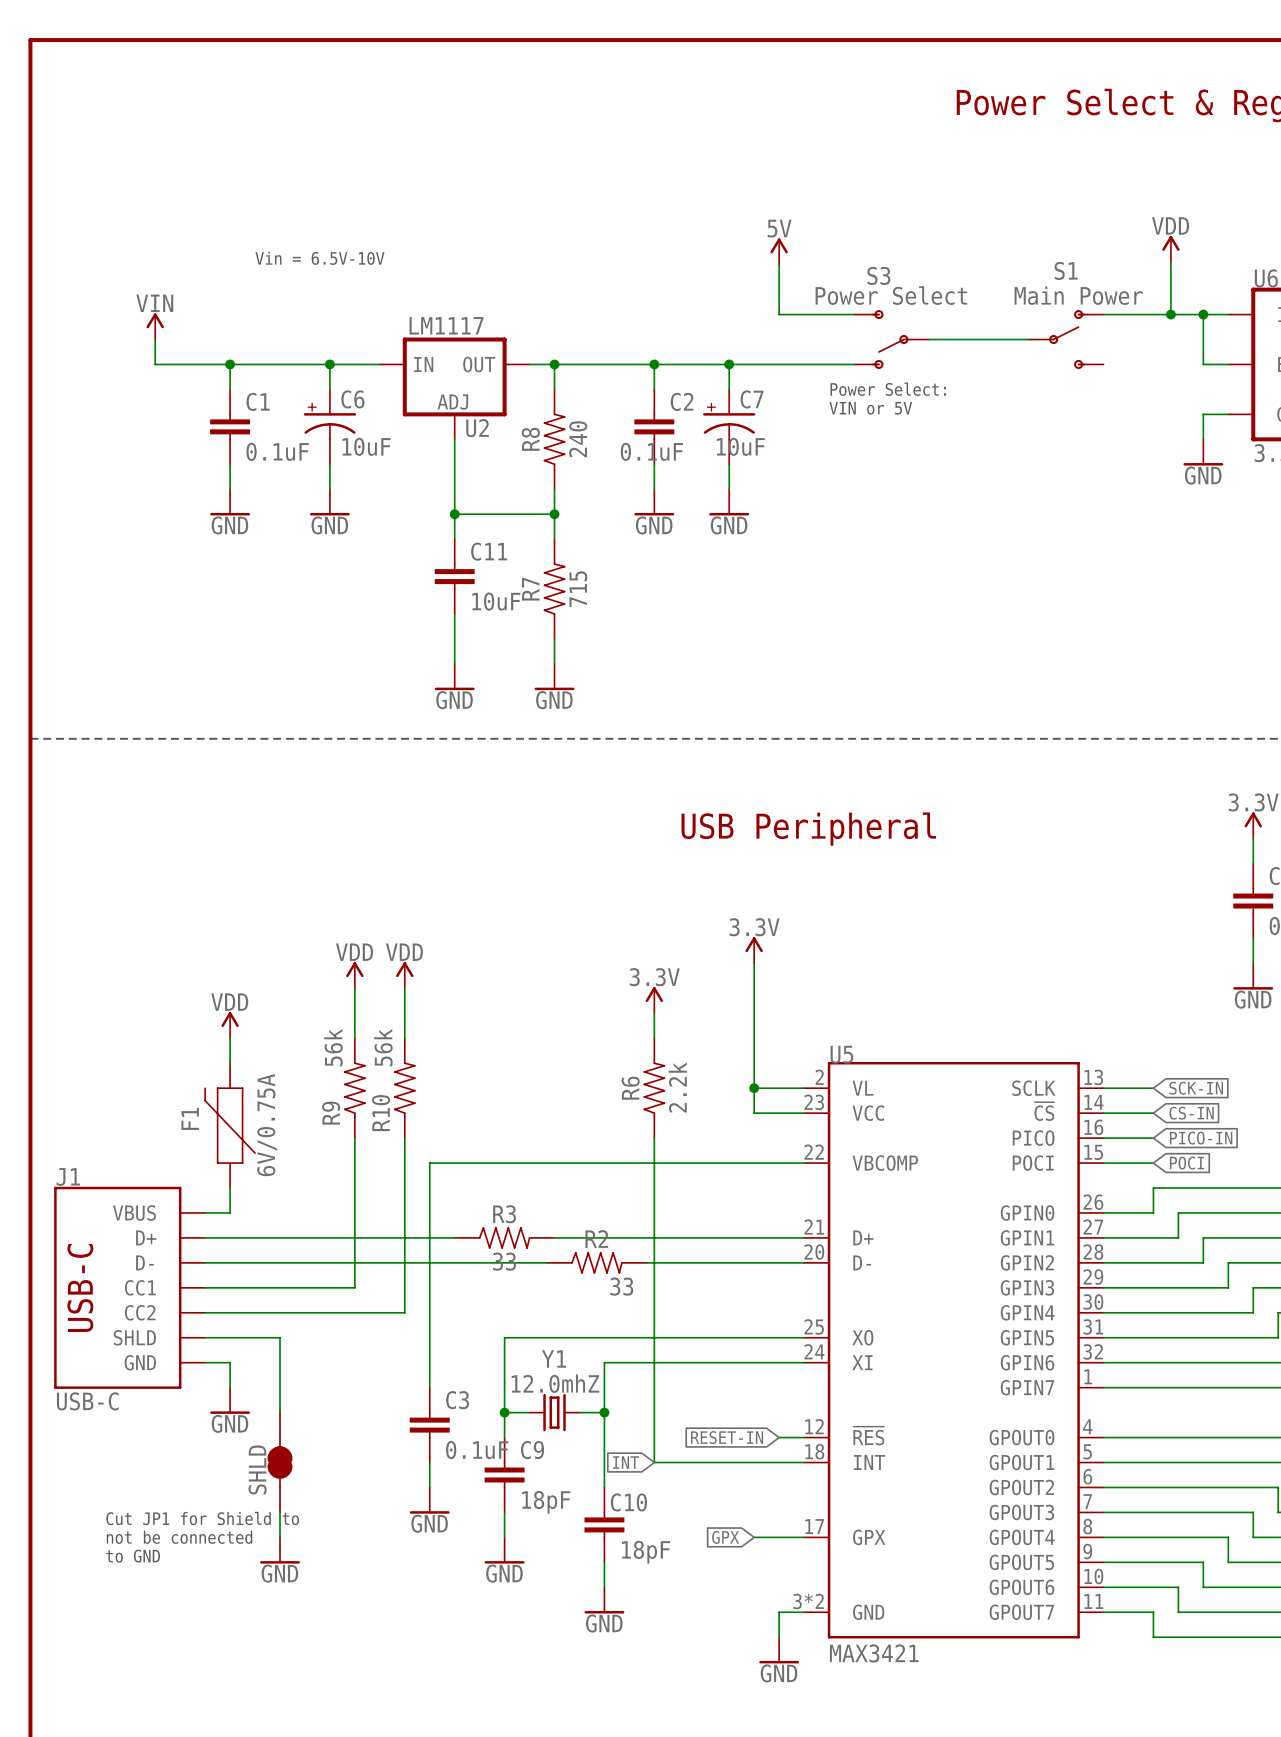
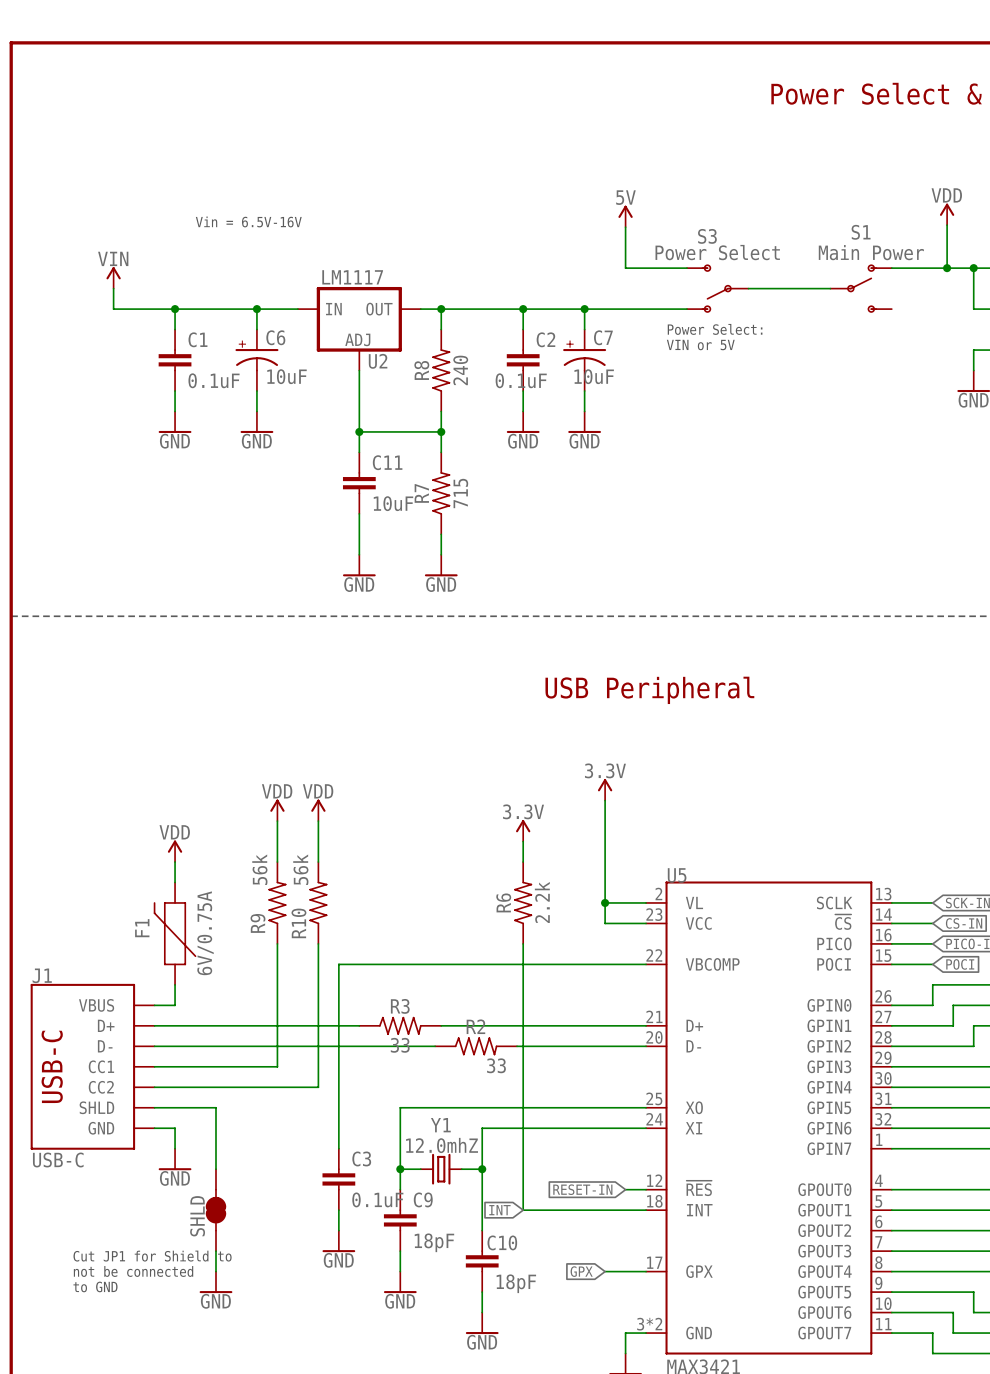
text: Vin = 6.5V-10V (319, 258) -> Vin = 6.5V-16V (248, 221)

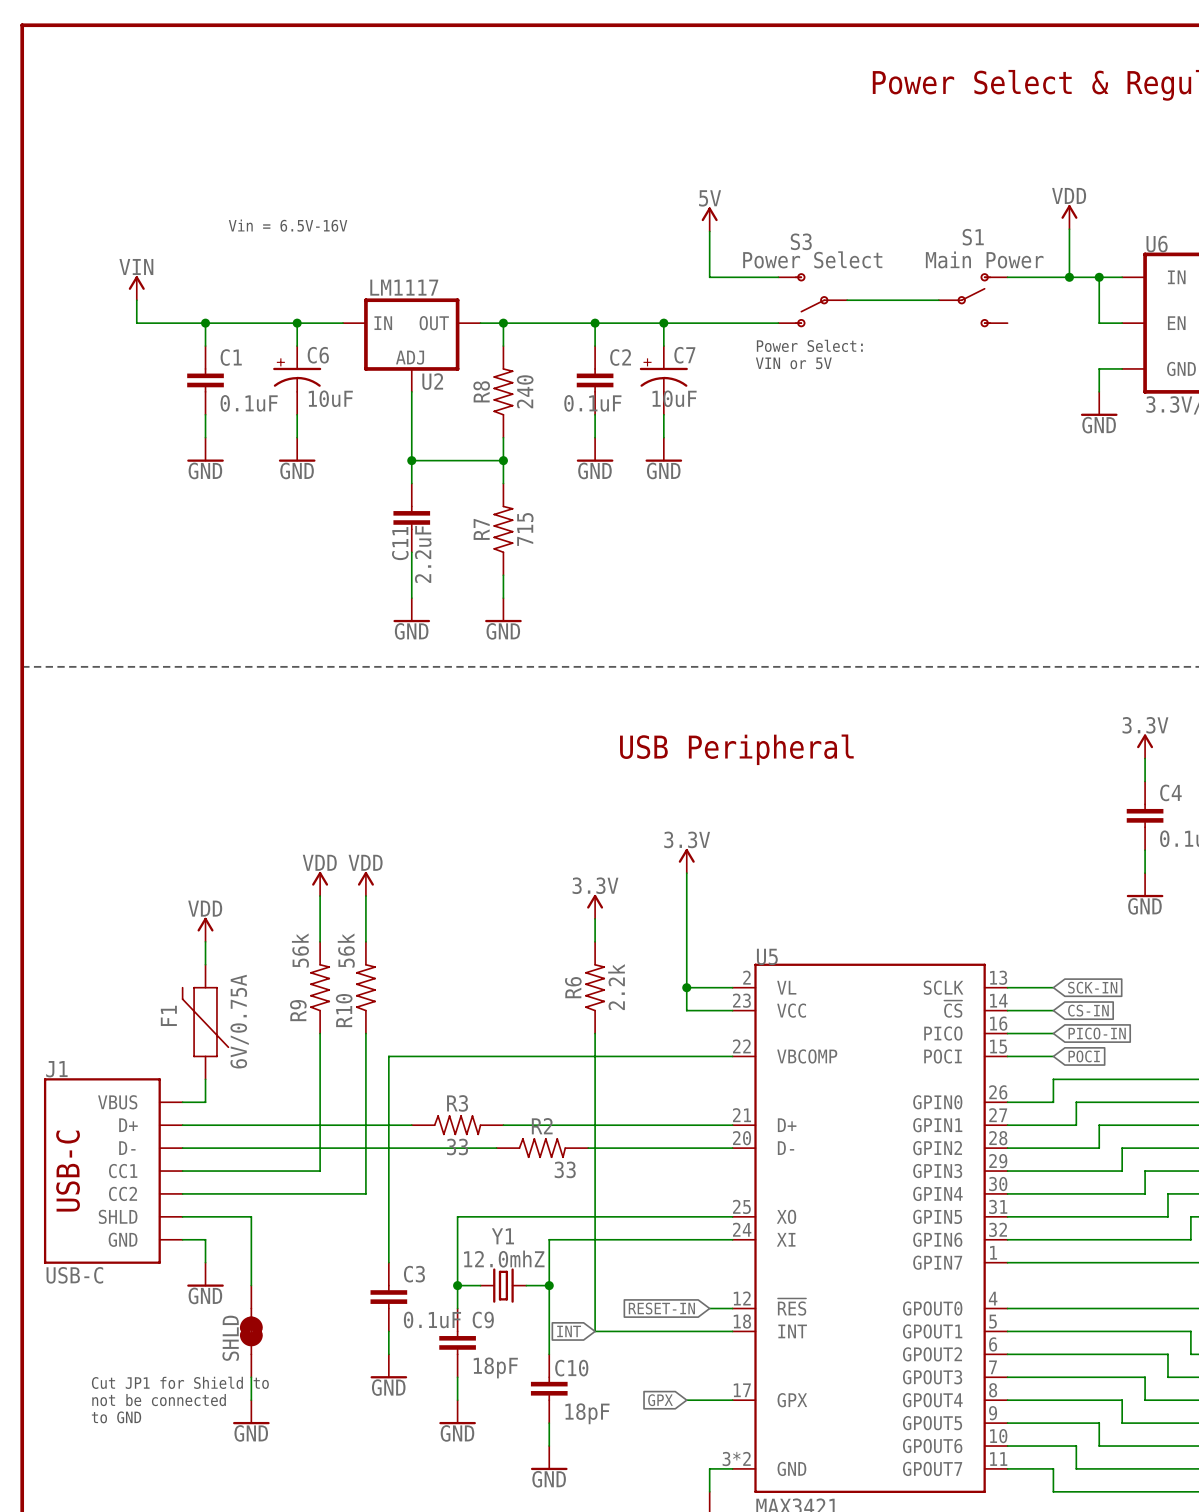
C11 name rotation: 0° (387, 462) -> 90° counterclockwise (400, 543)
C11 name position: C11 (387, 462) -> C11 (400, 543)
C11 value: 10uF (393, 503) -> 2.2uF (423, 554)

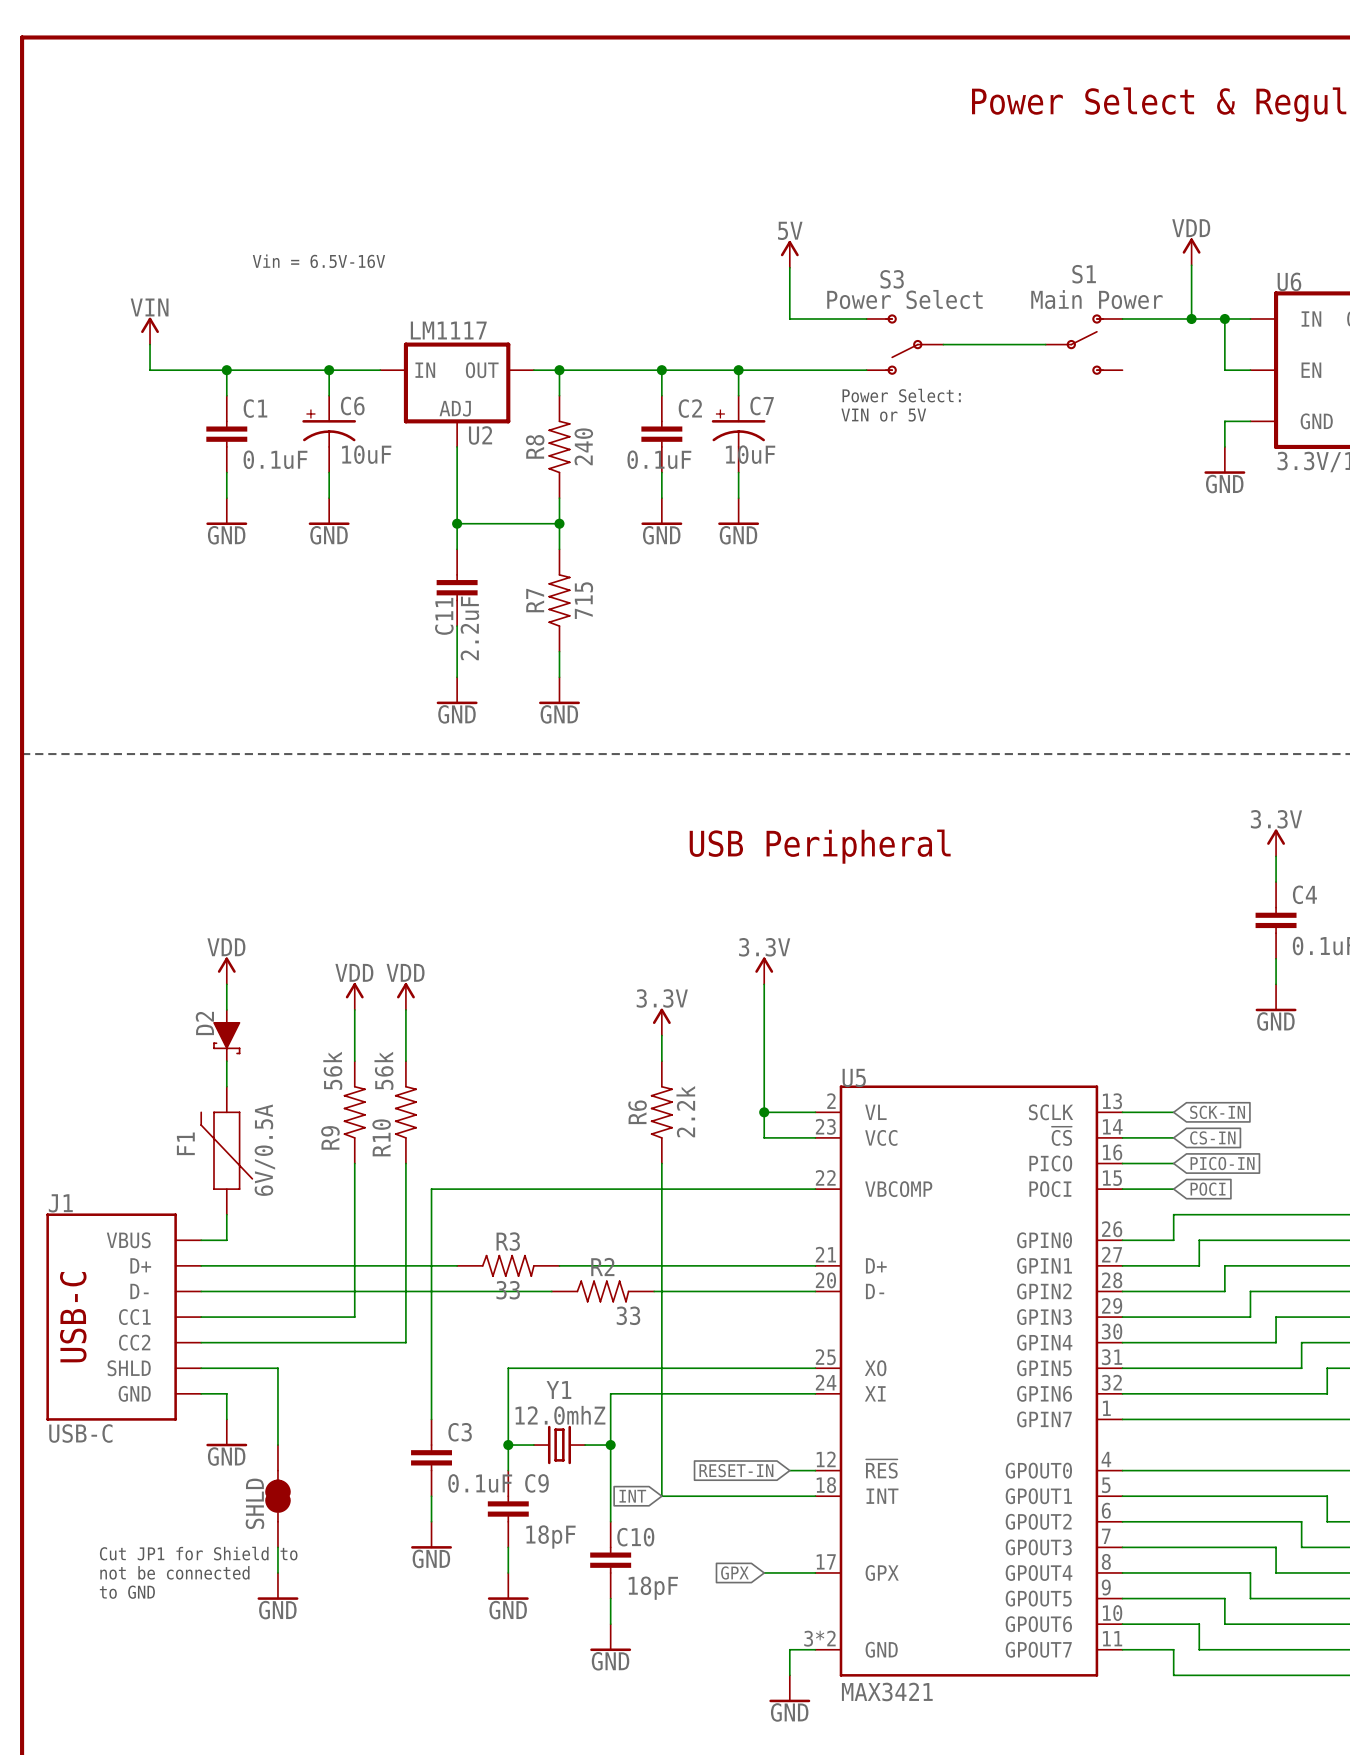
wire: none -> (226, 984) (226, 1009)
D2: none -> (226, 1035)
power symbol position: VDD (205, 929) -> VDD (226, 970)
F1 value: 6V/0.75A (239, 1021) -> 6V/0.5A (264, 1150)

